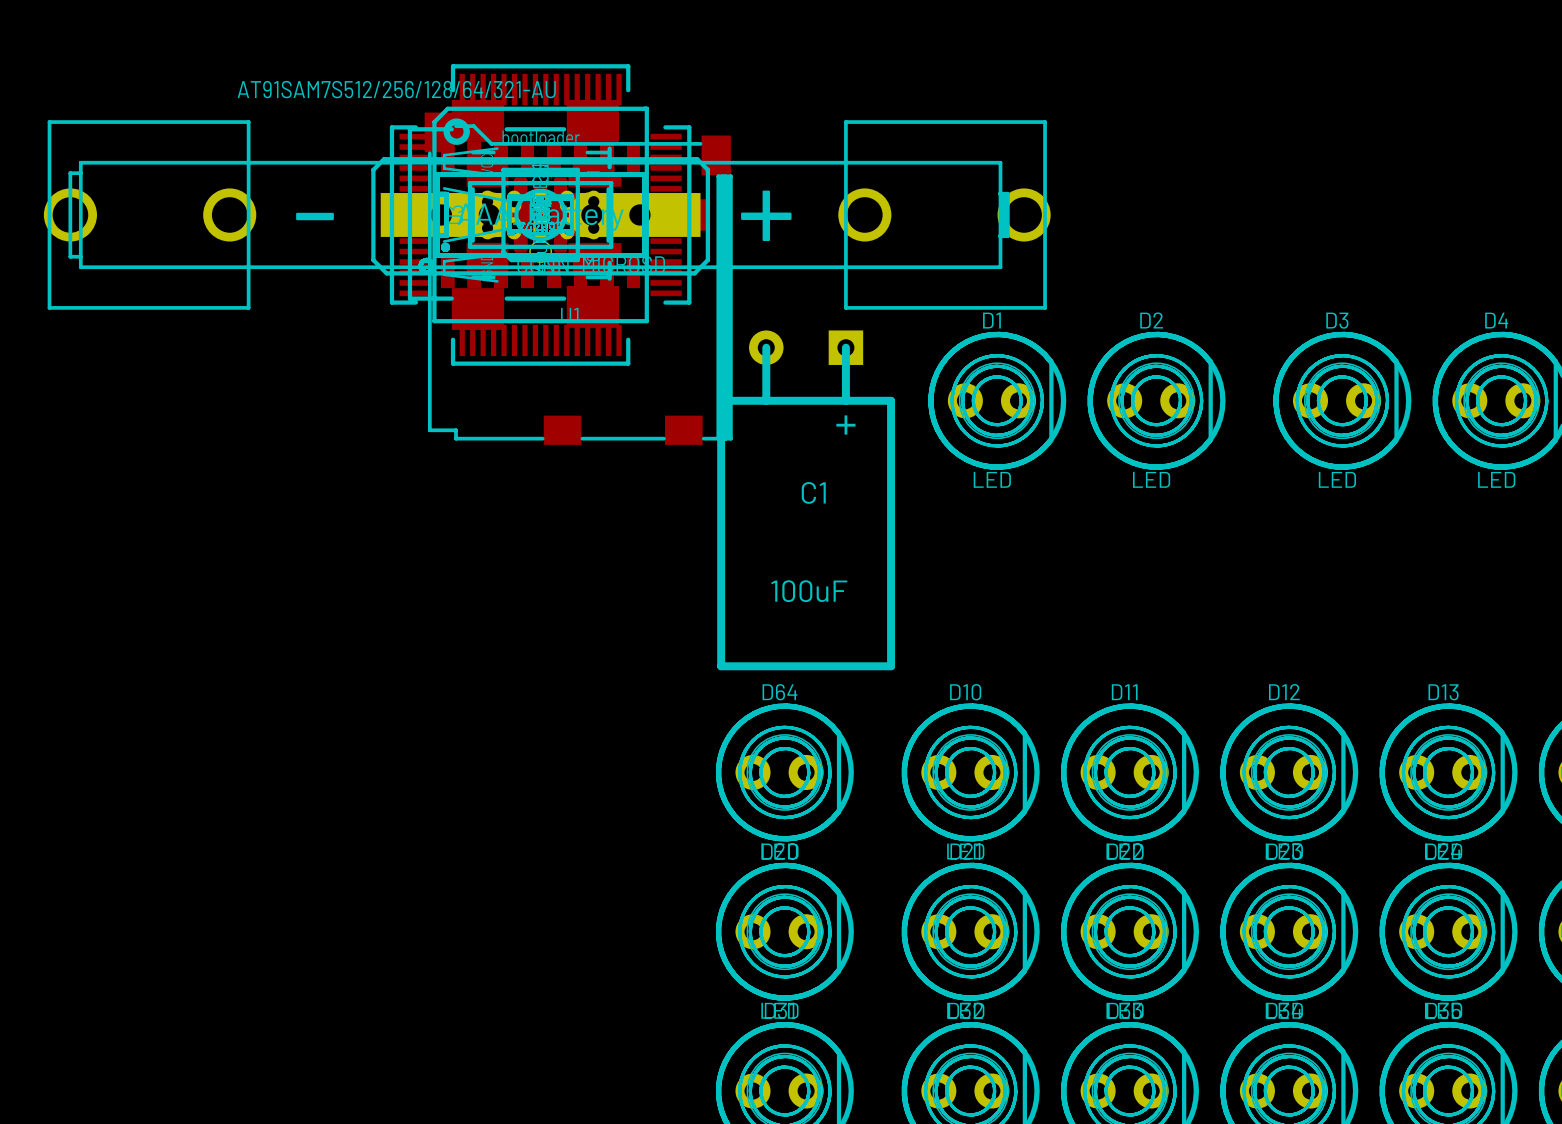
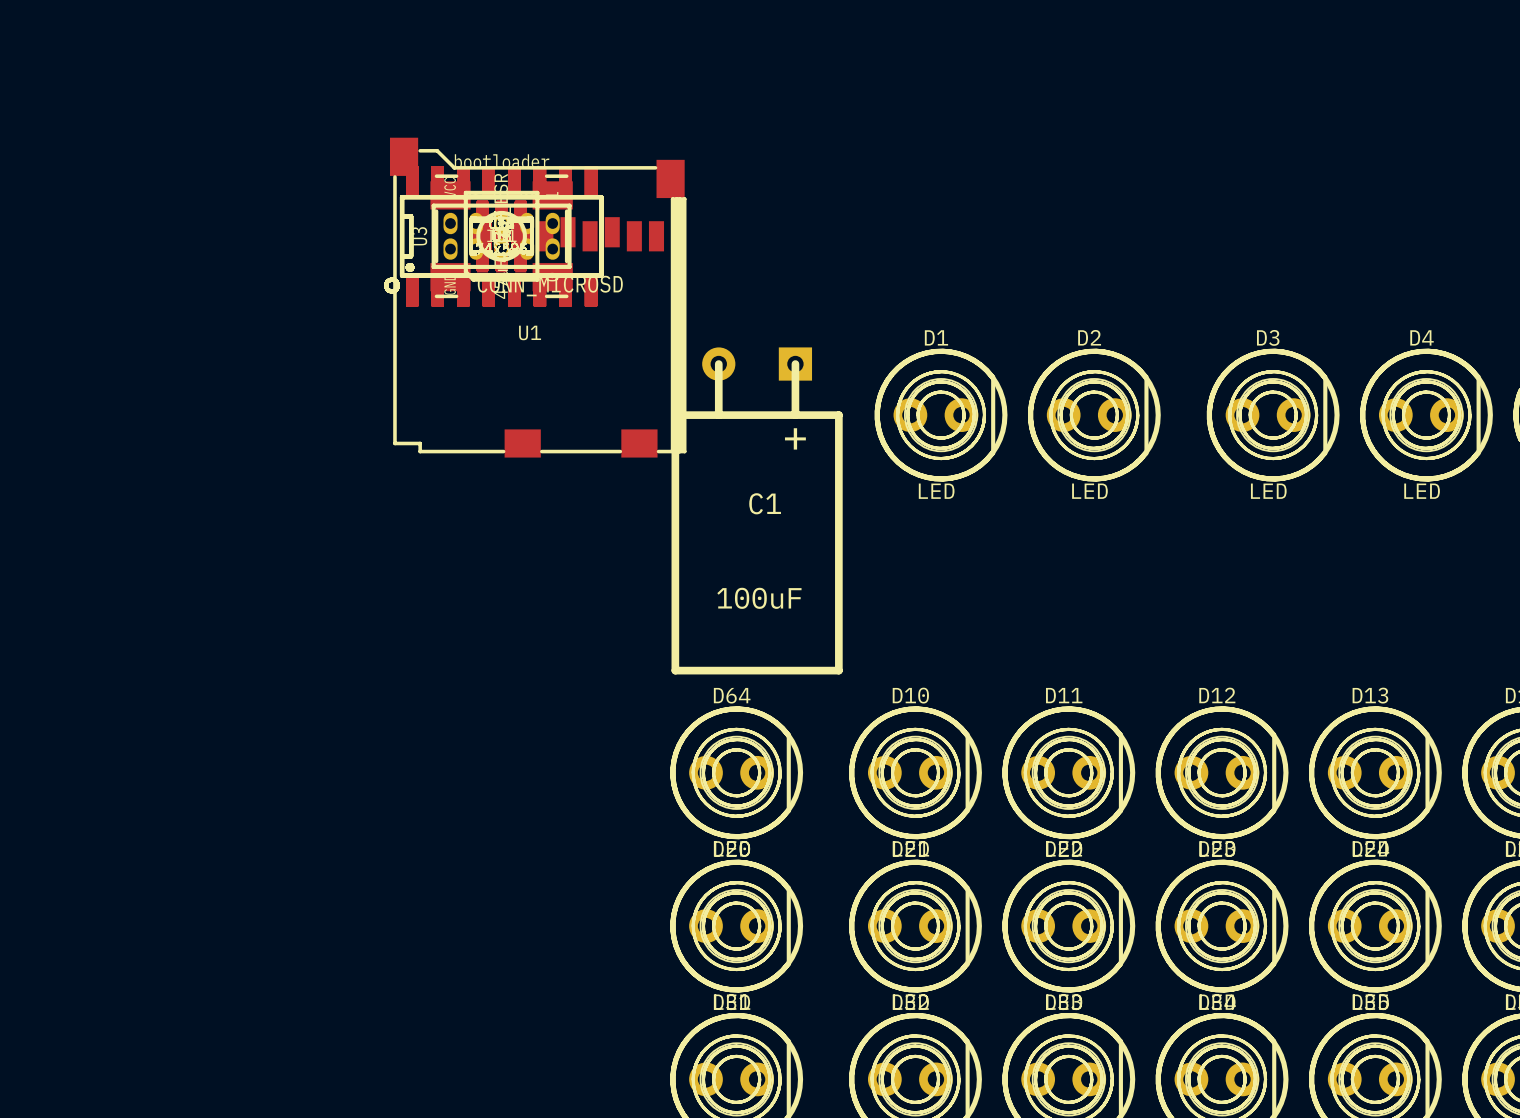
part: (514, 214) -> none
part: AT91SAM7S512/256/128/64/321-AU (540, 214) -> none
part: (547, 214) -> none
part: (540, 216) -> none

